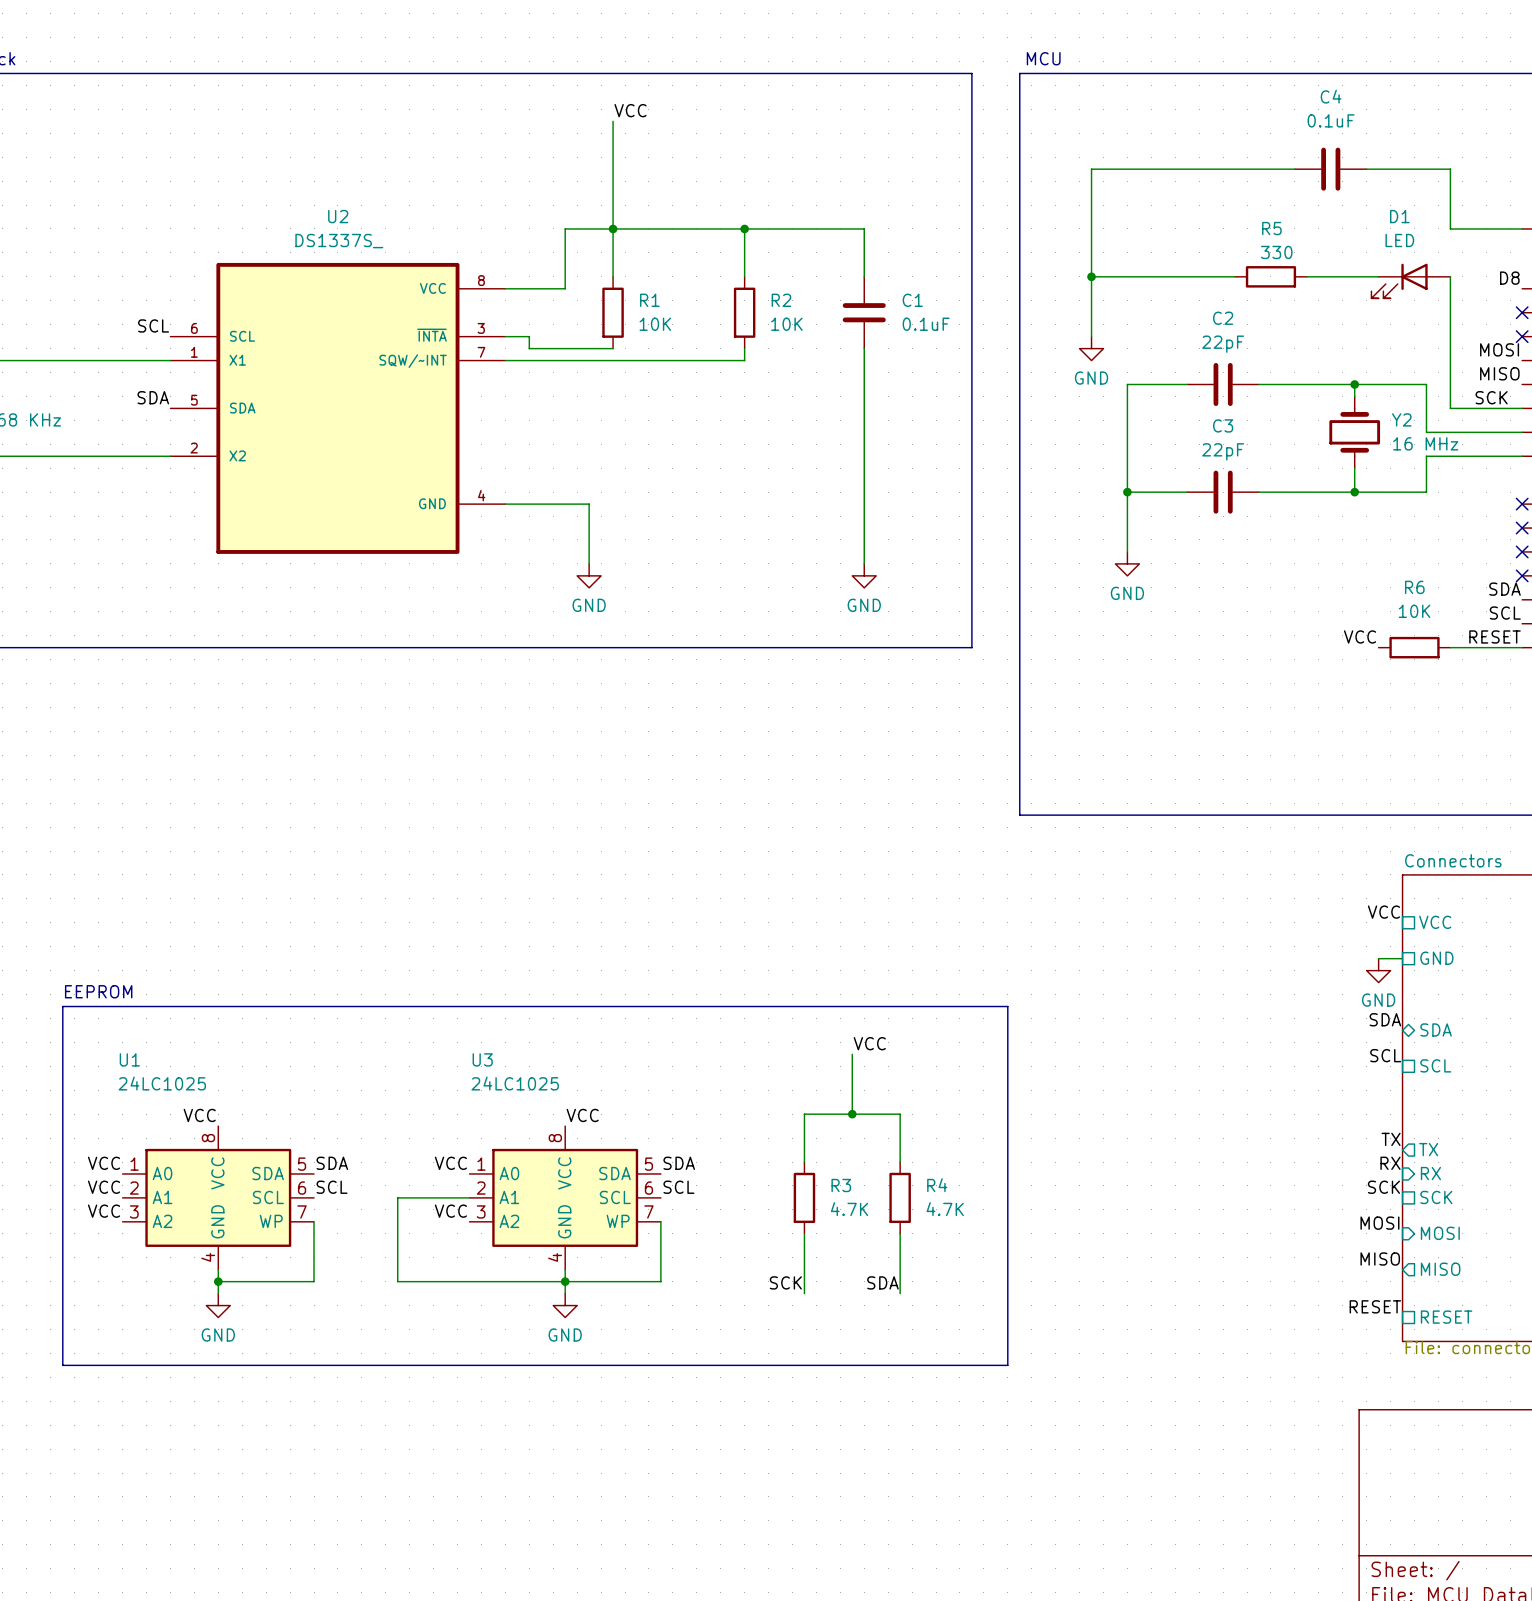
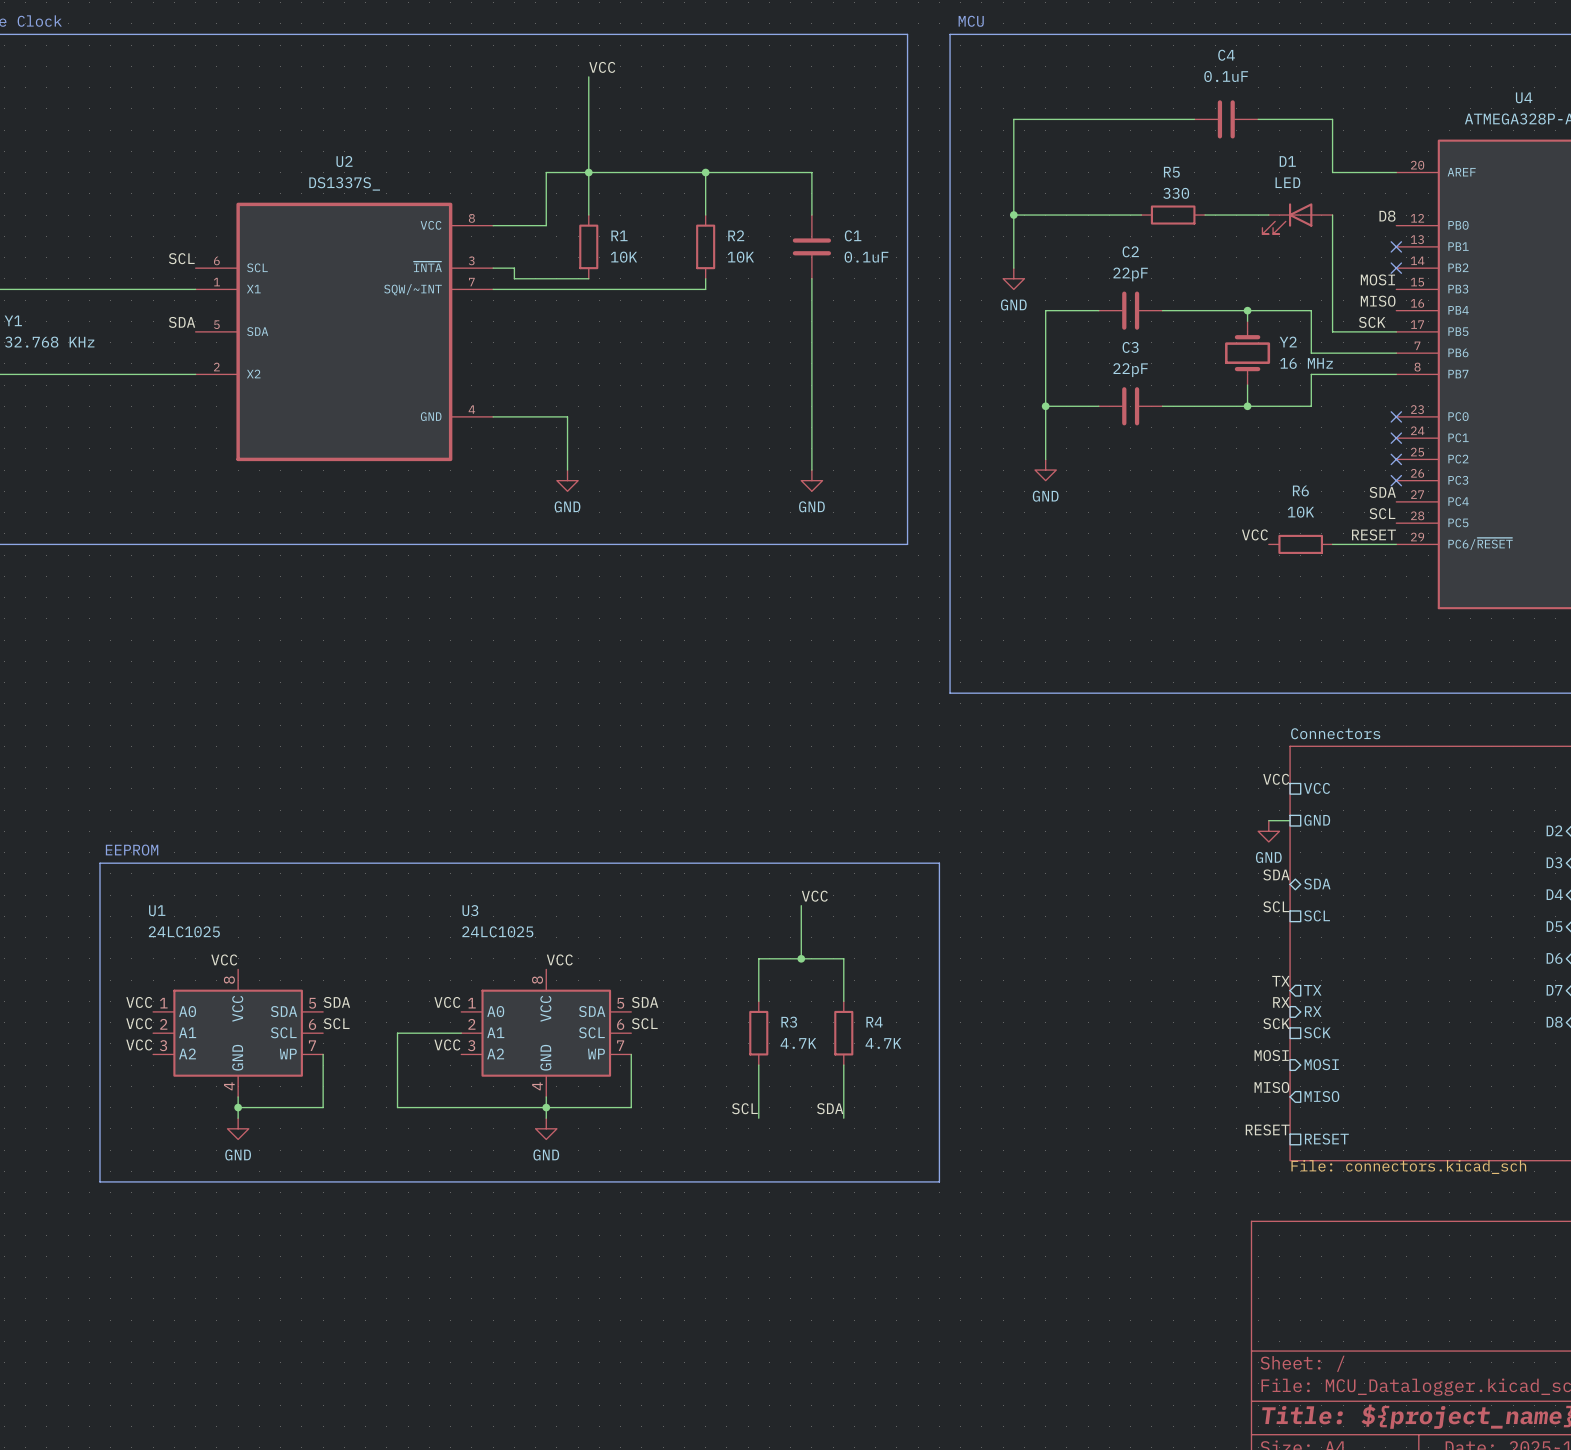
label: SCK (785, 1282) -> SCL (744, 1108)

